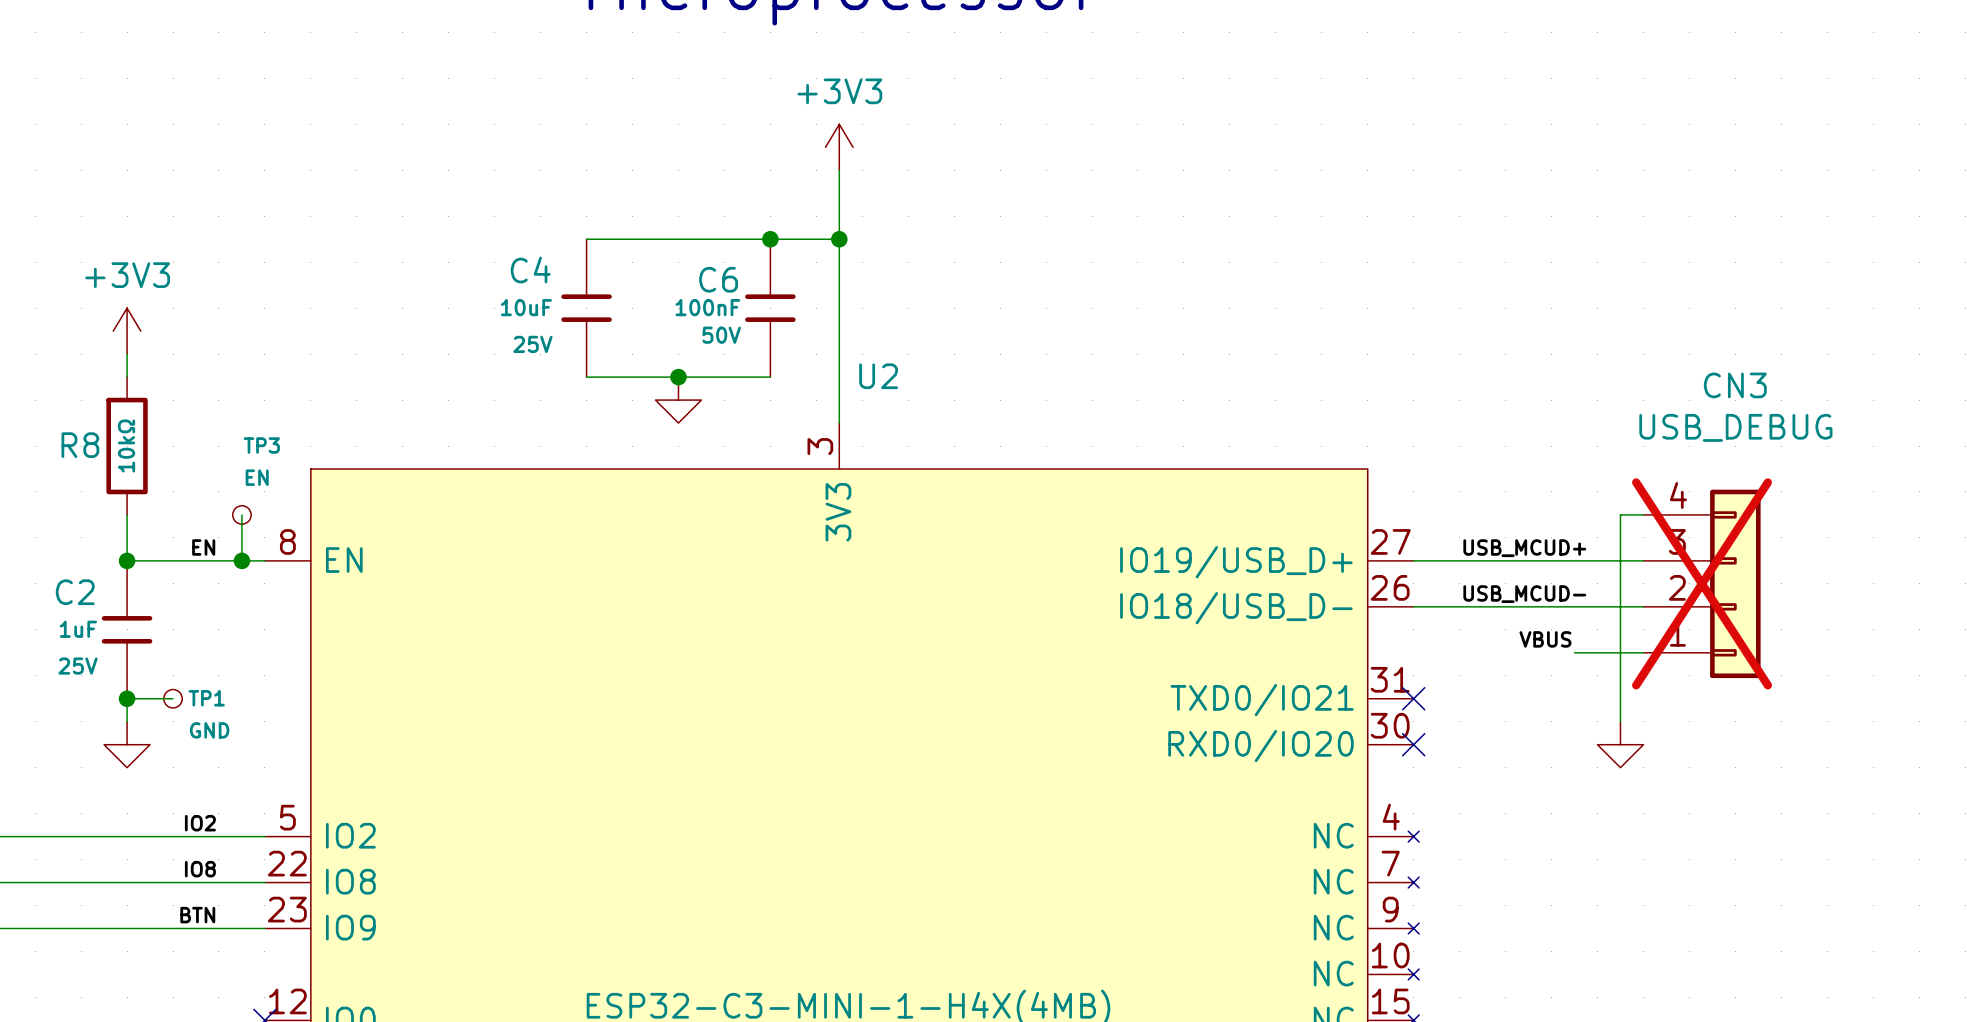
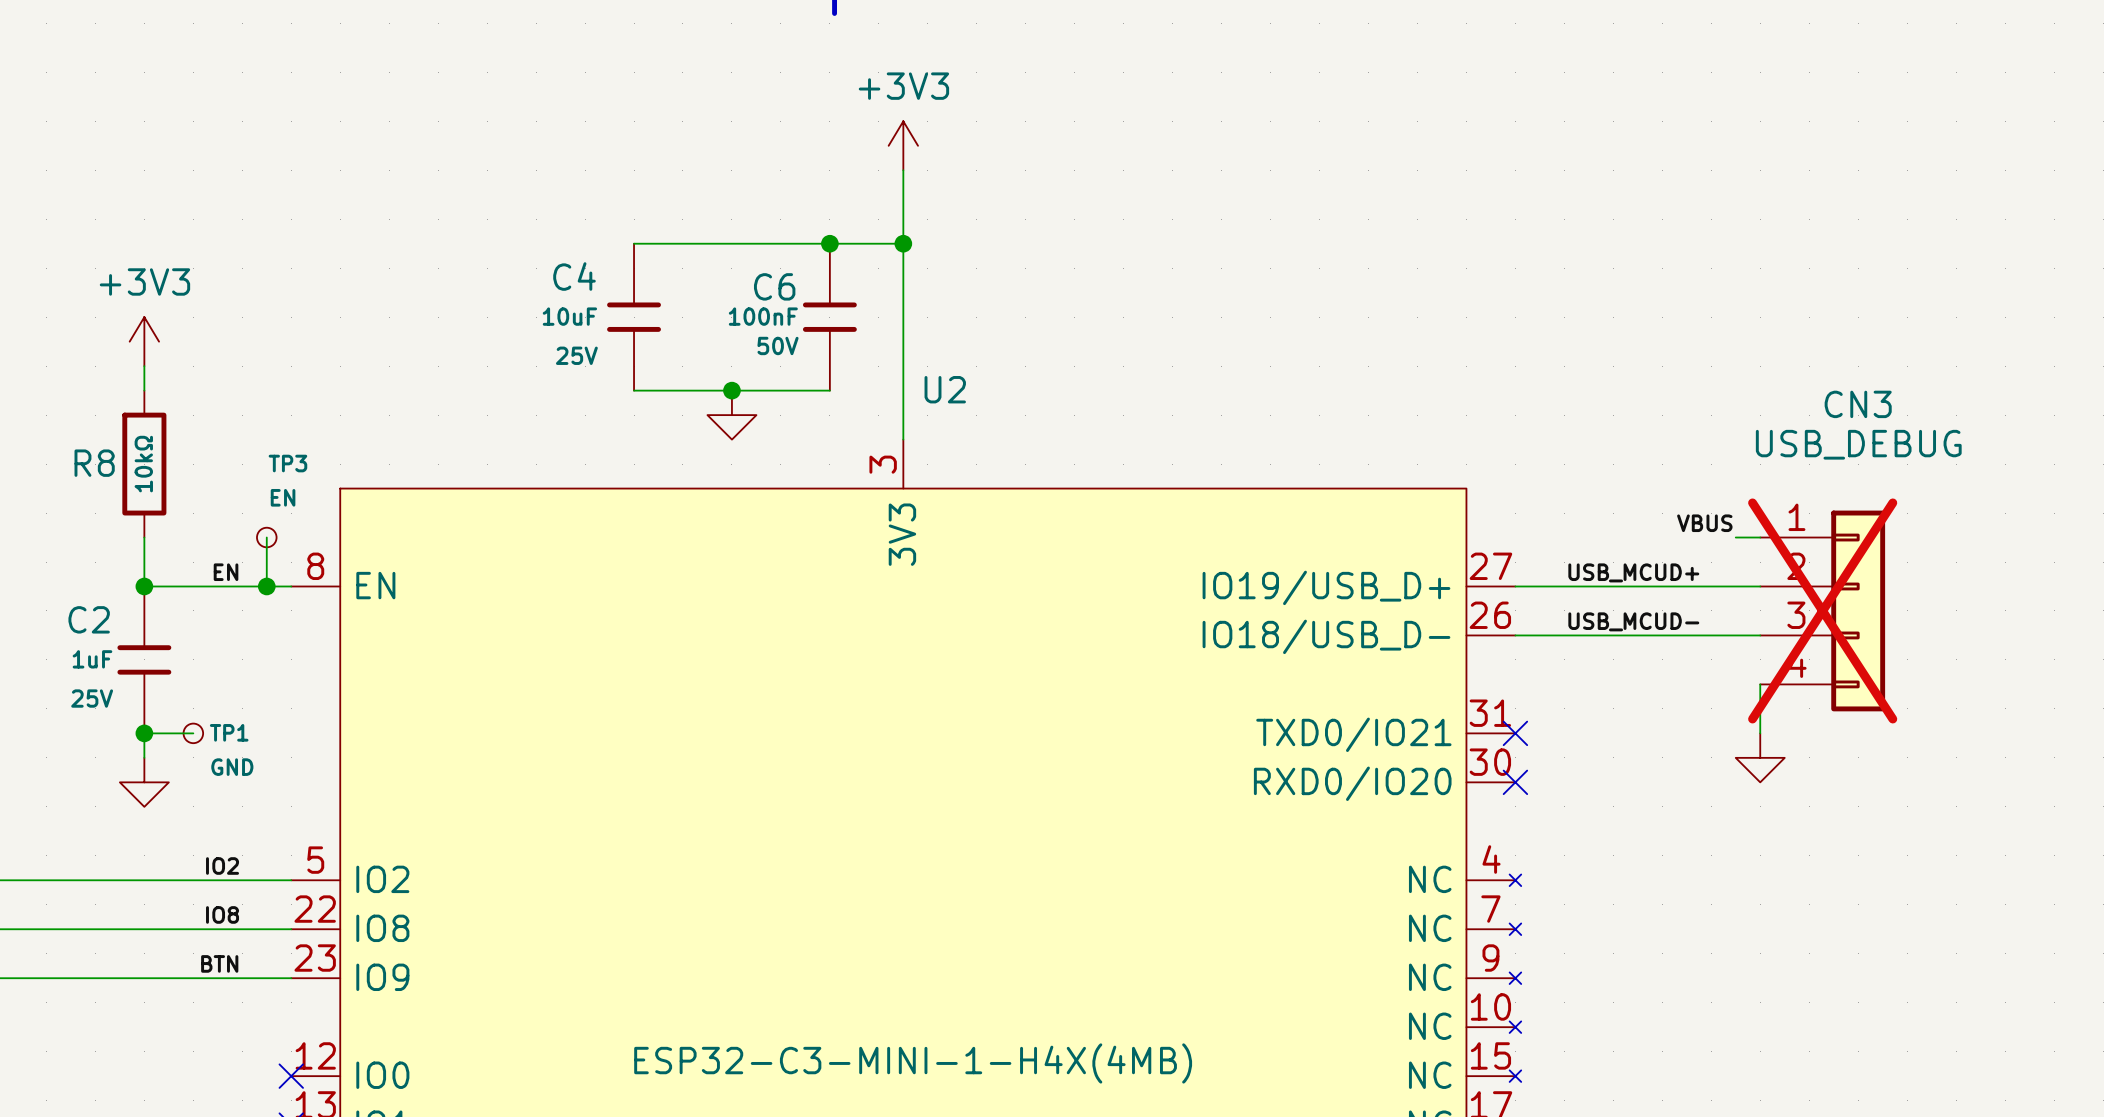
wire: (1620, 514) (1620, 721) -> none
CN3 flip: as is (1735, 583) -> up-down (1858, 610)
label position: VBUS (1545, 639) -> VBUS (1704, 523)
wire: (1574, 652) (1643, 652) -> (1760, 733) (1760, 684)
power symbol position: (1620, 744) -> (1760, 757)

